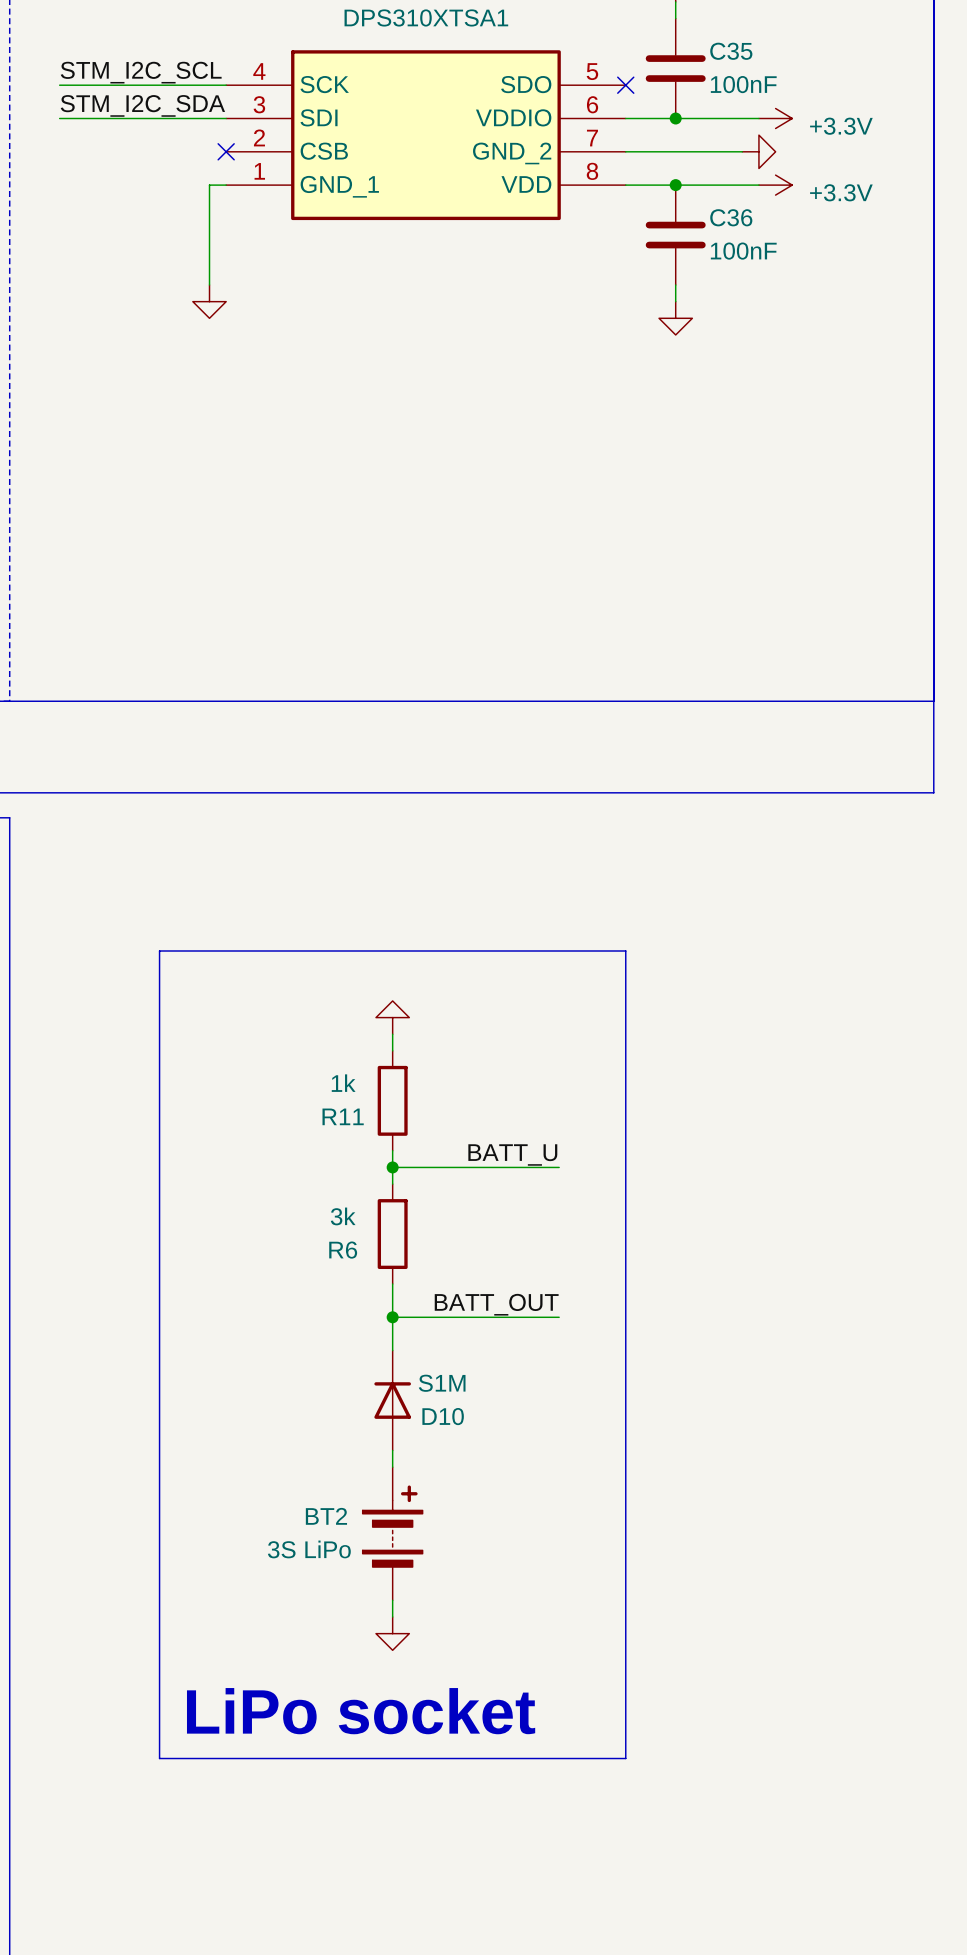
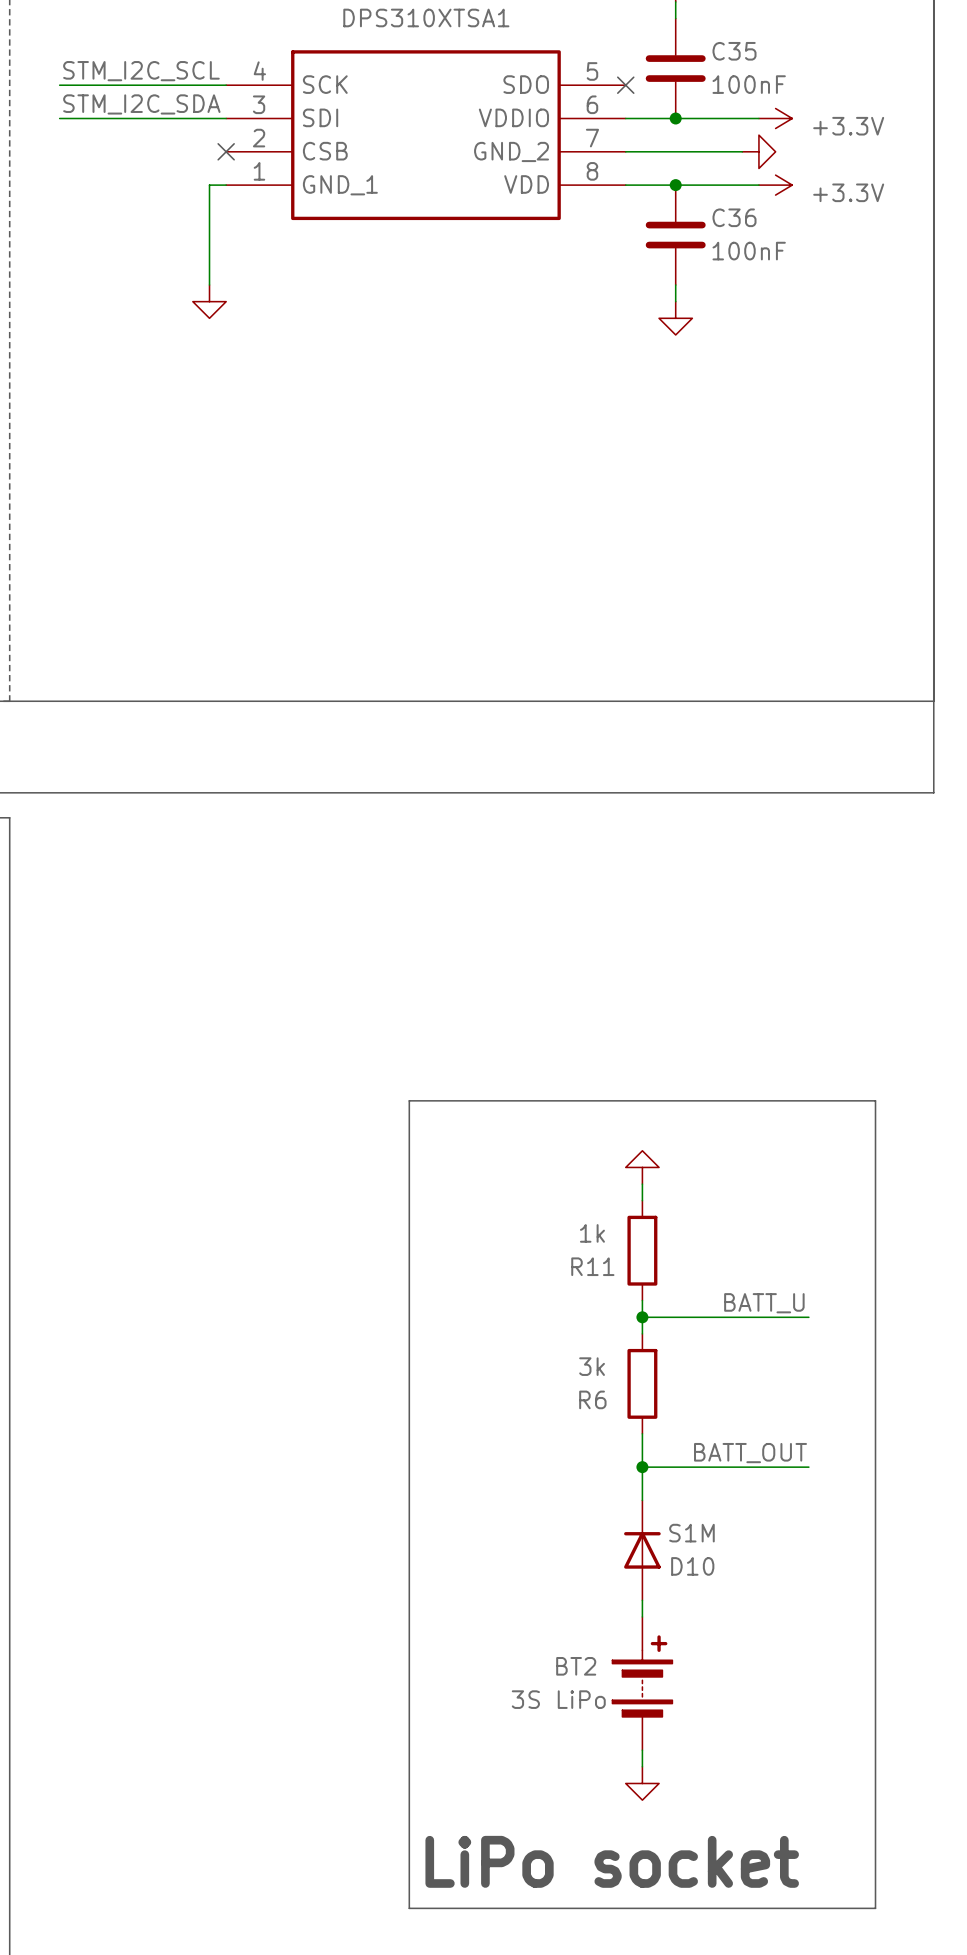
line: (159, 951) (625, 951) (625, 1758) (159, 1758) (159, 951) -> (409, 1100) (875, 1100) (875, 1908) (409, 1908) (409, 1100)
power symbol: (392, 1017) -> none
wire: (392, 1034) (392, 1050) -> (642, 1184) (642, 1200)
R11 position: (392, 1100) -> (642, 1250)
wire: (392, 1150) (392, 1184) -> (642, 1300) (642, 1333)
label position: BATT_U (512, 1154) -> BATT_U (764, 1303)
wire: (392, 1167) (559, 1167) -> (642, 1317) (808, 1317)
junction: (392, 1167) -> none
power symbol: none -> (642, 1167)
R6 position: (392, 1234) -> (642, 1383)
wire: (392, 1283) (392, 1350) -> (642, 1433) (642, 1500)
label position: BATT_OUT (496, 1304) -> BATT_OUT (750, 1453)
wire: (392, 1317) (559, 1317) -> (642, 1467) (808, 1467)
junction: (392, 1317) -> none
junction: none -> (642, 1317)
D10 position: (392, 1400) -> (642, 1550)
wire: (392, 1450) (392, 1467) -> (642, 1600) (642, 1616)
junction: none -> (642, 1467)
BT2 position: (392, 1533) -> (642, 1683)
wire: (392, 1600) (392, 1616) -> (642, 1750) (642, 1766)
power symbol: (392, 1633) -> none
text position: LiPo socket (361, 1711) -> LiPo socket (612, 1861)
power symbol: none -> (642, 1783)

